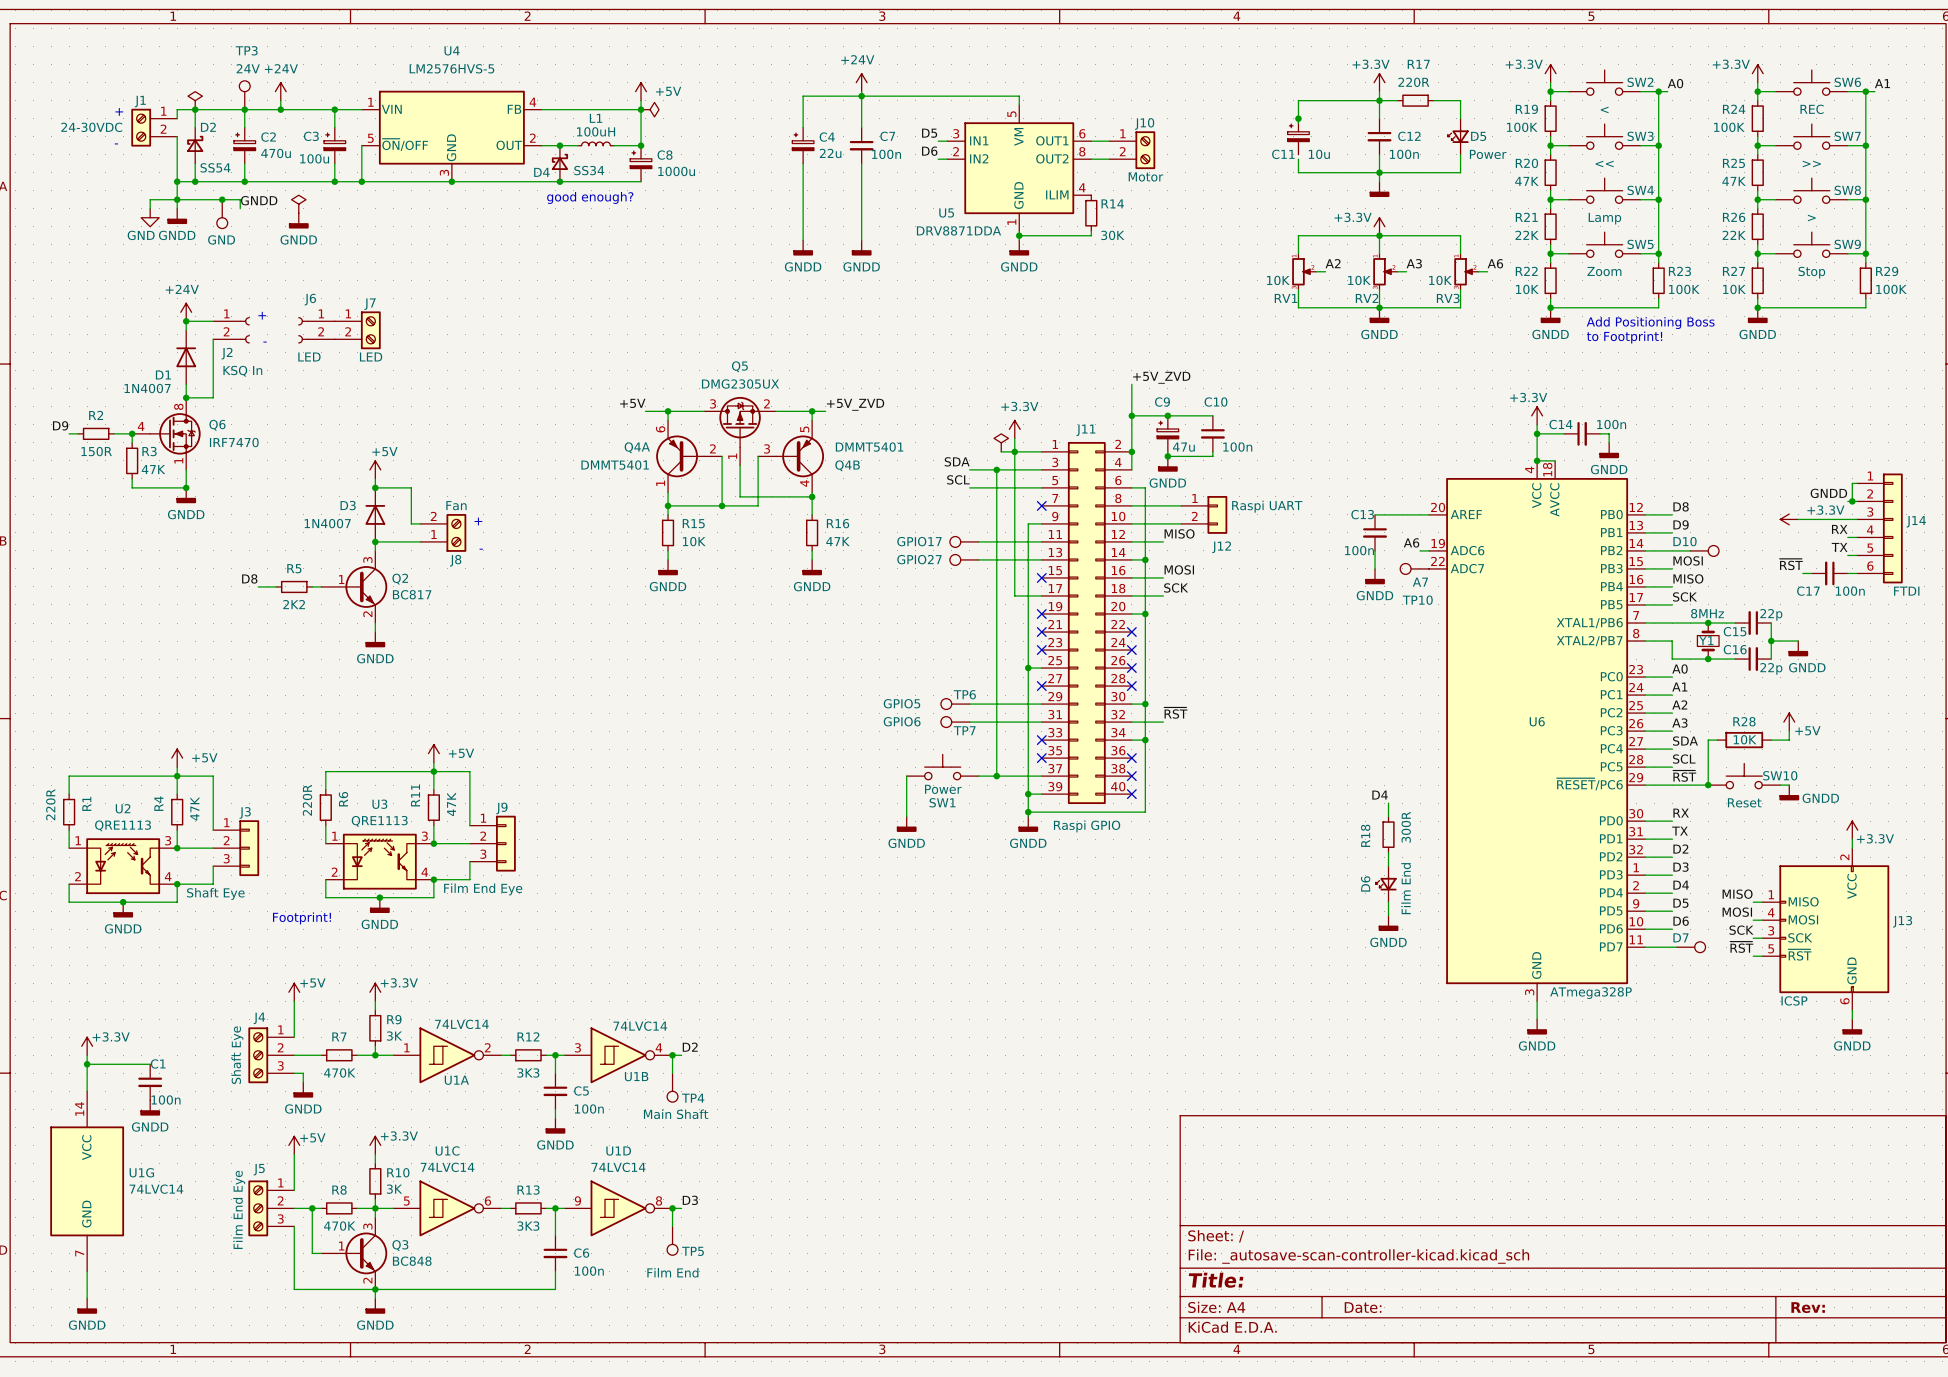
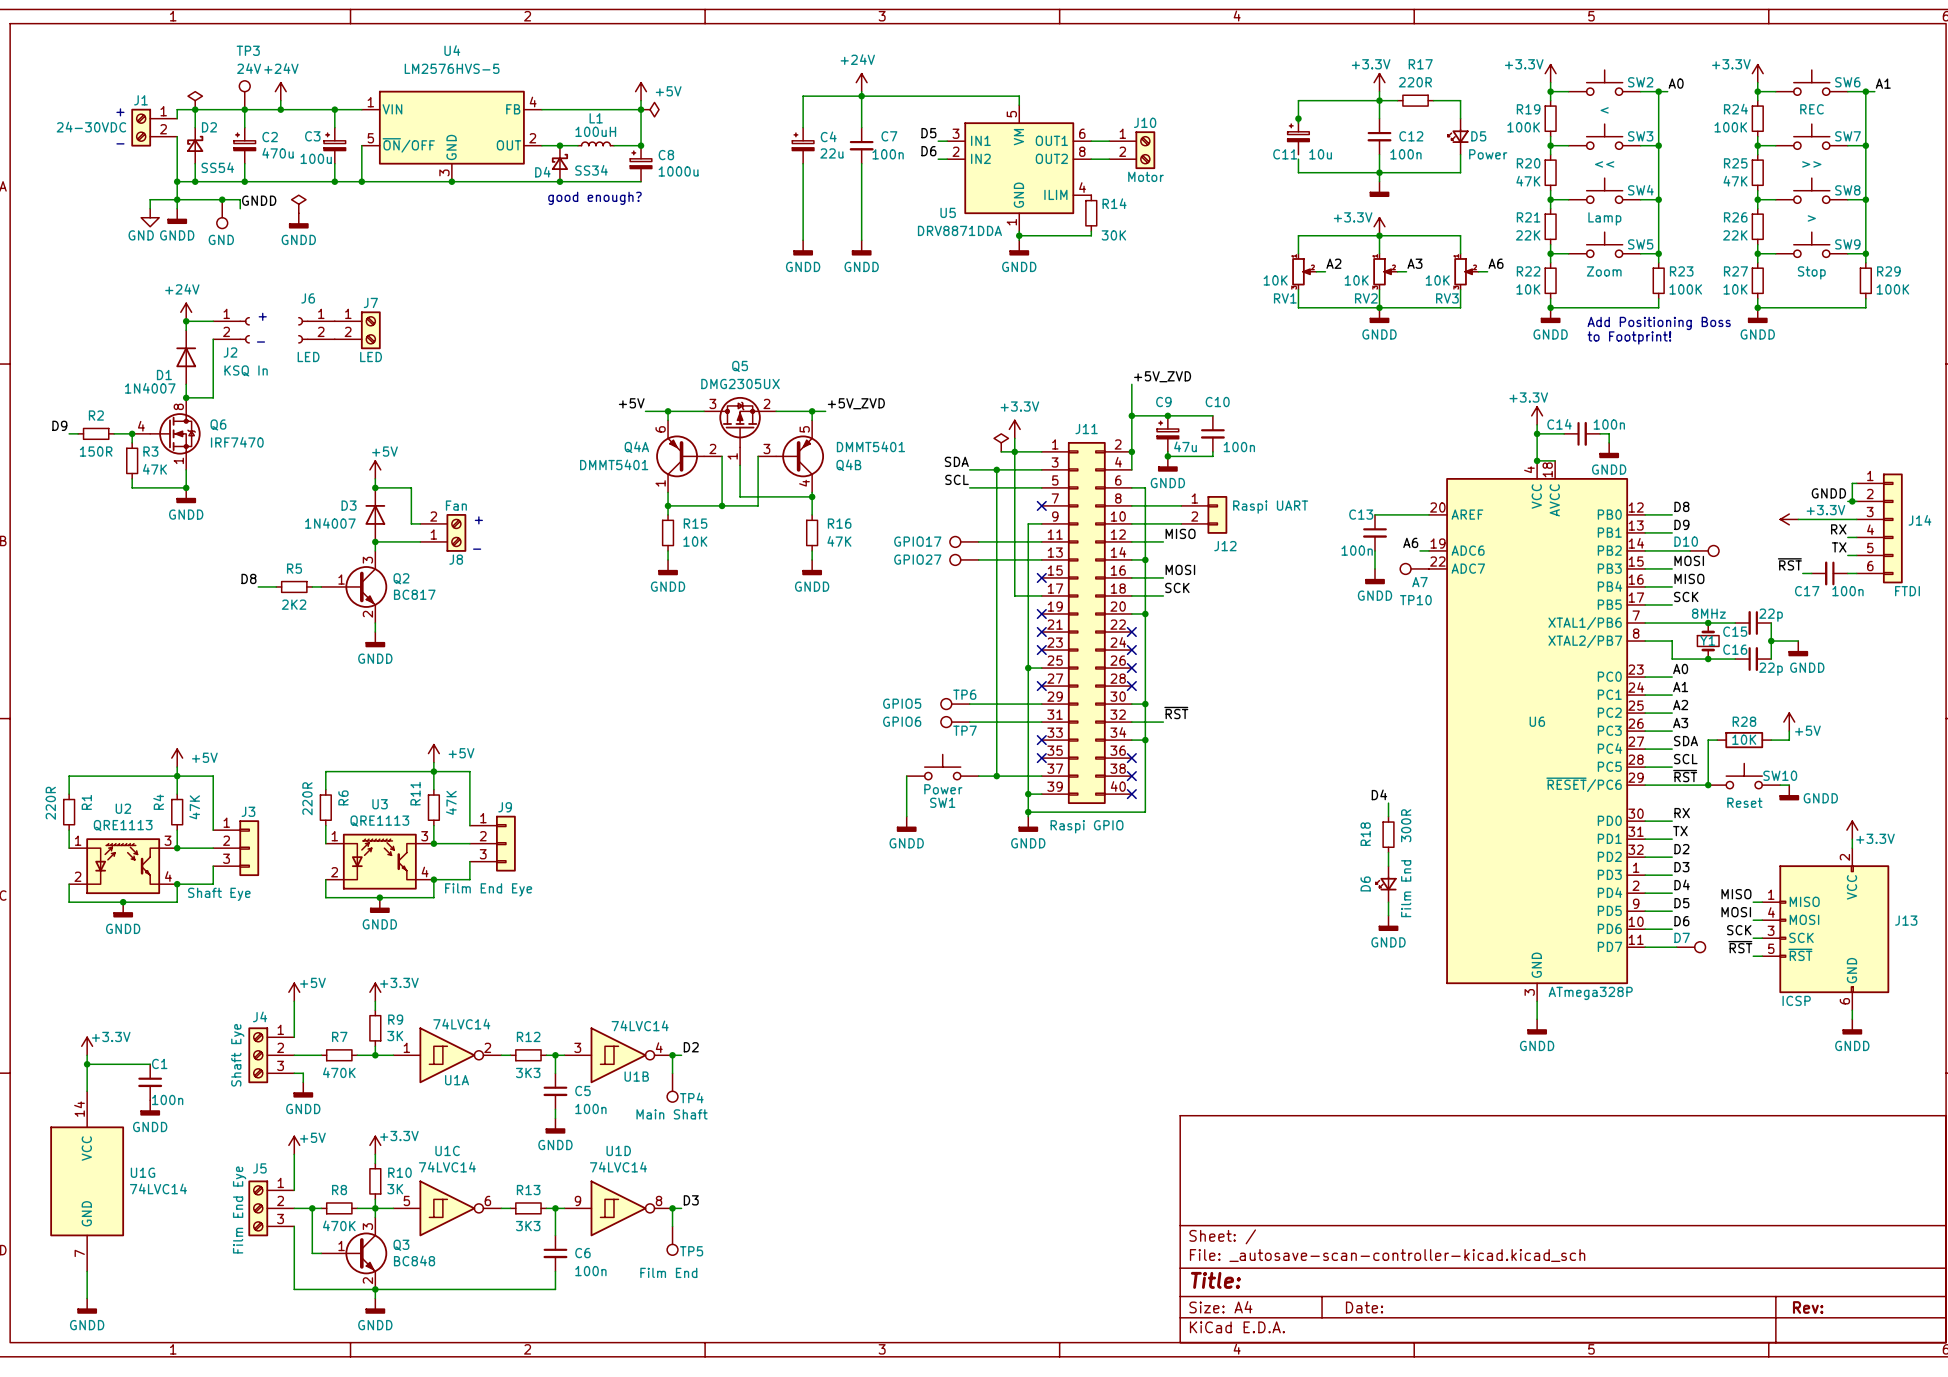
text: Footprint! (301, 918) -> none

